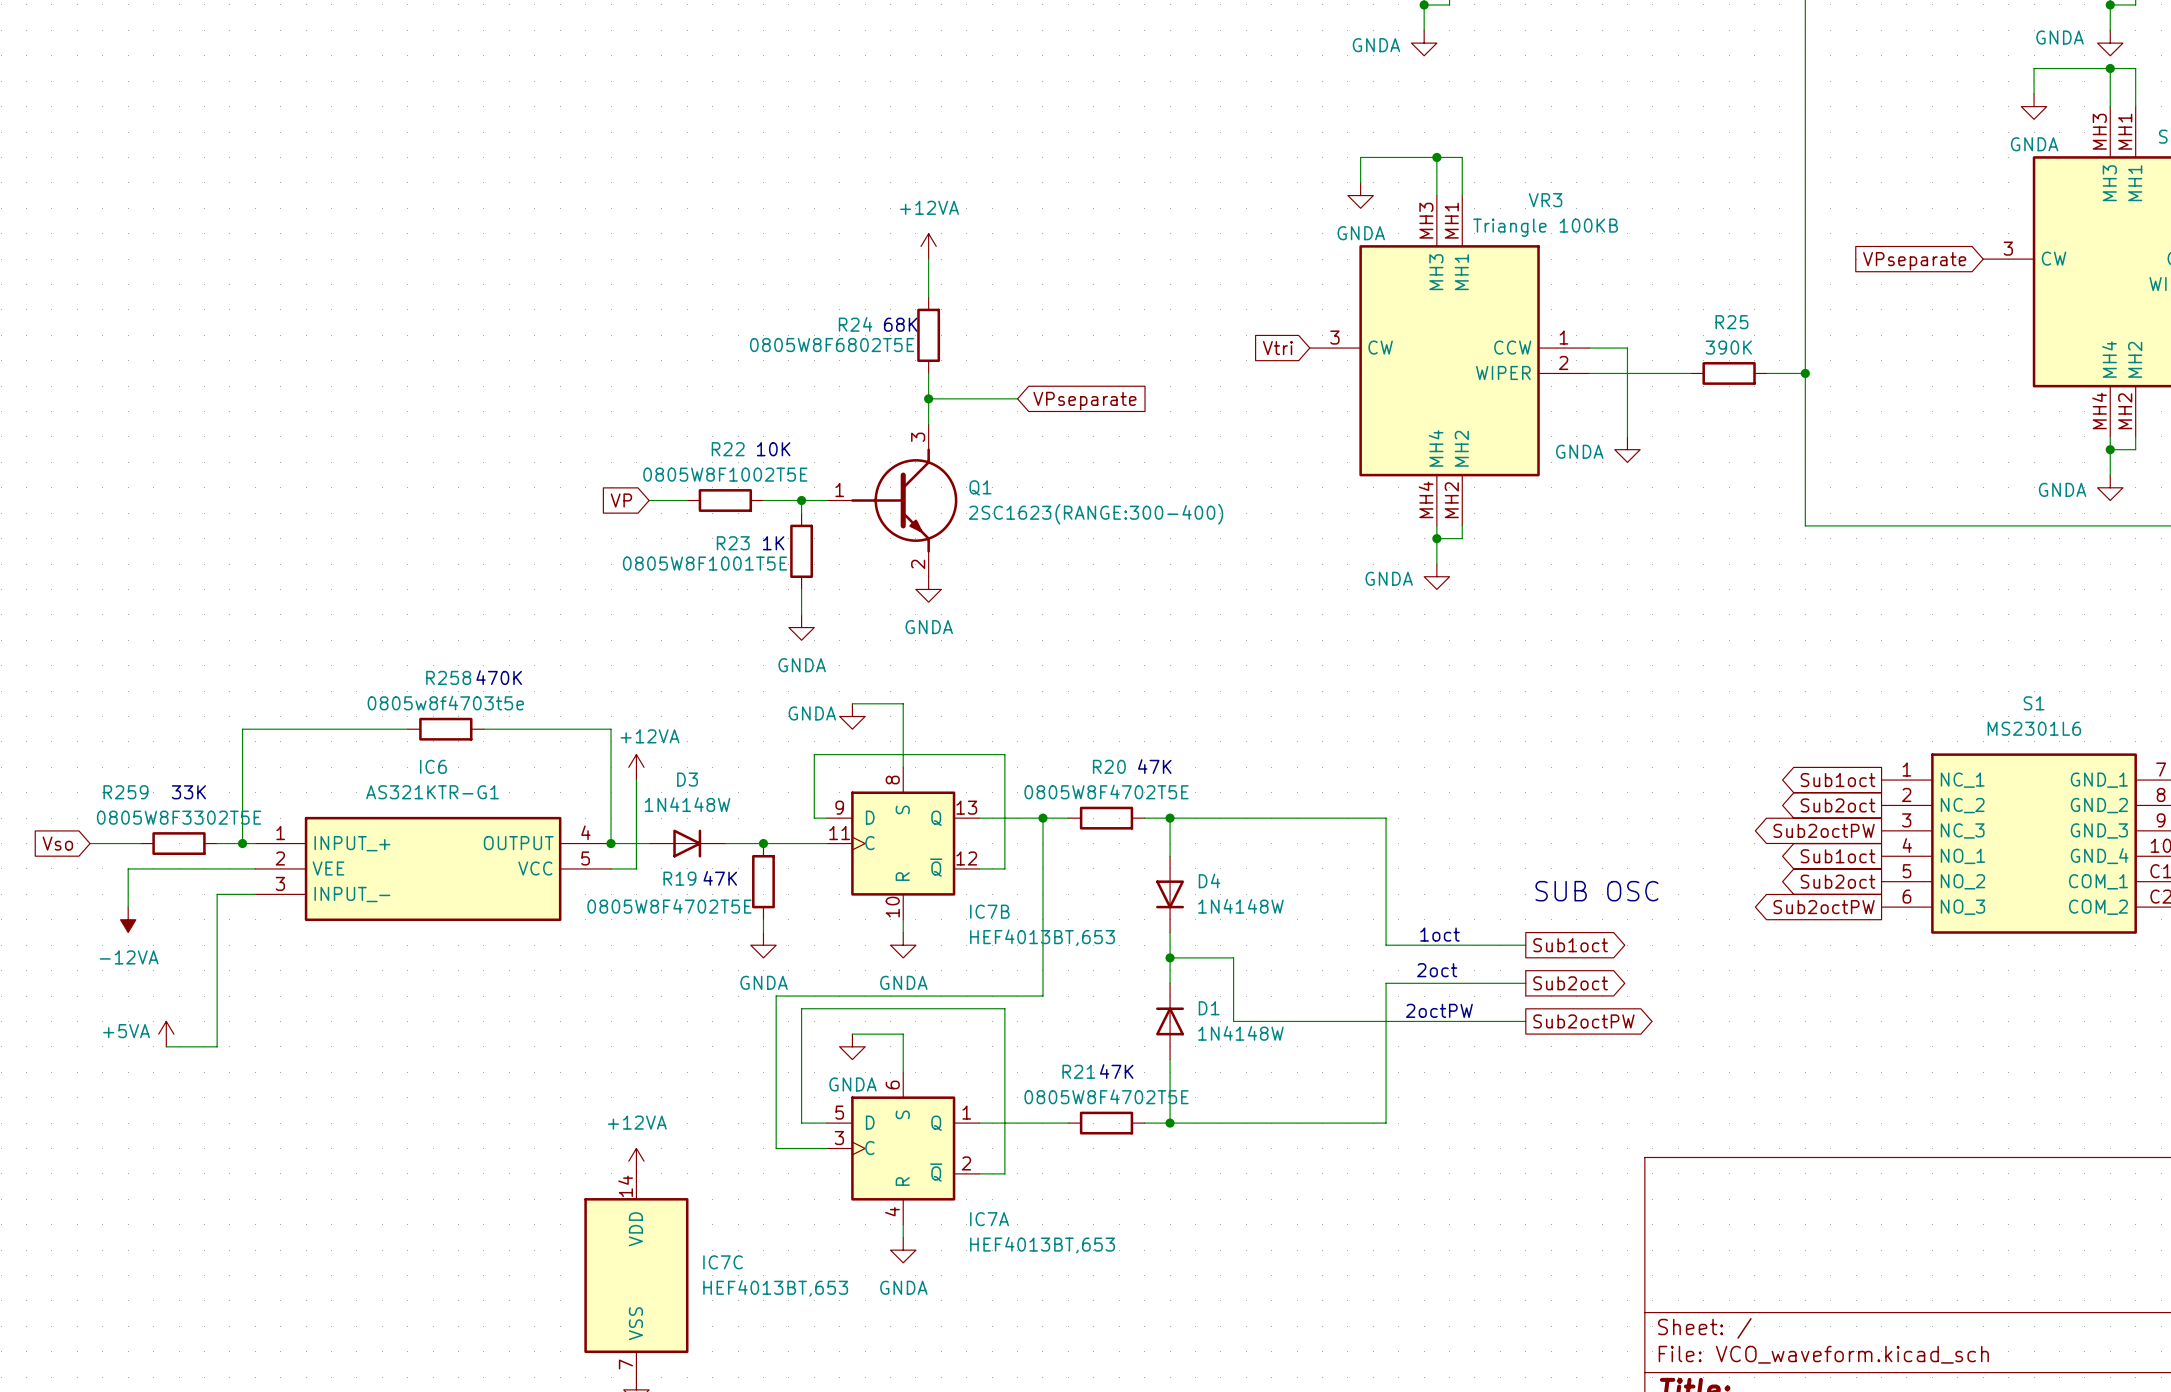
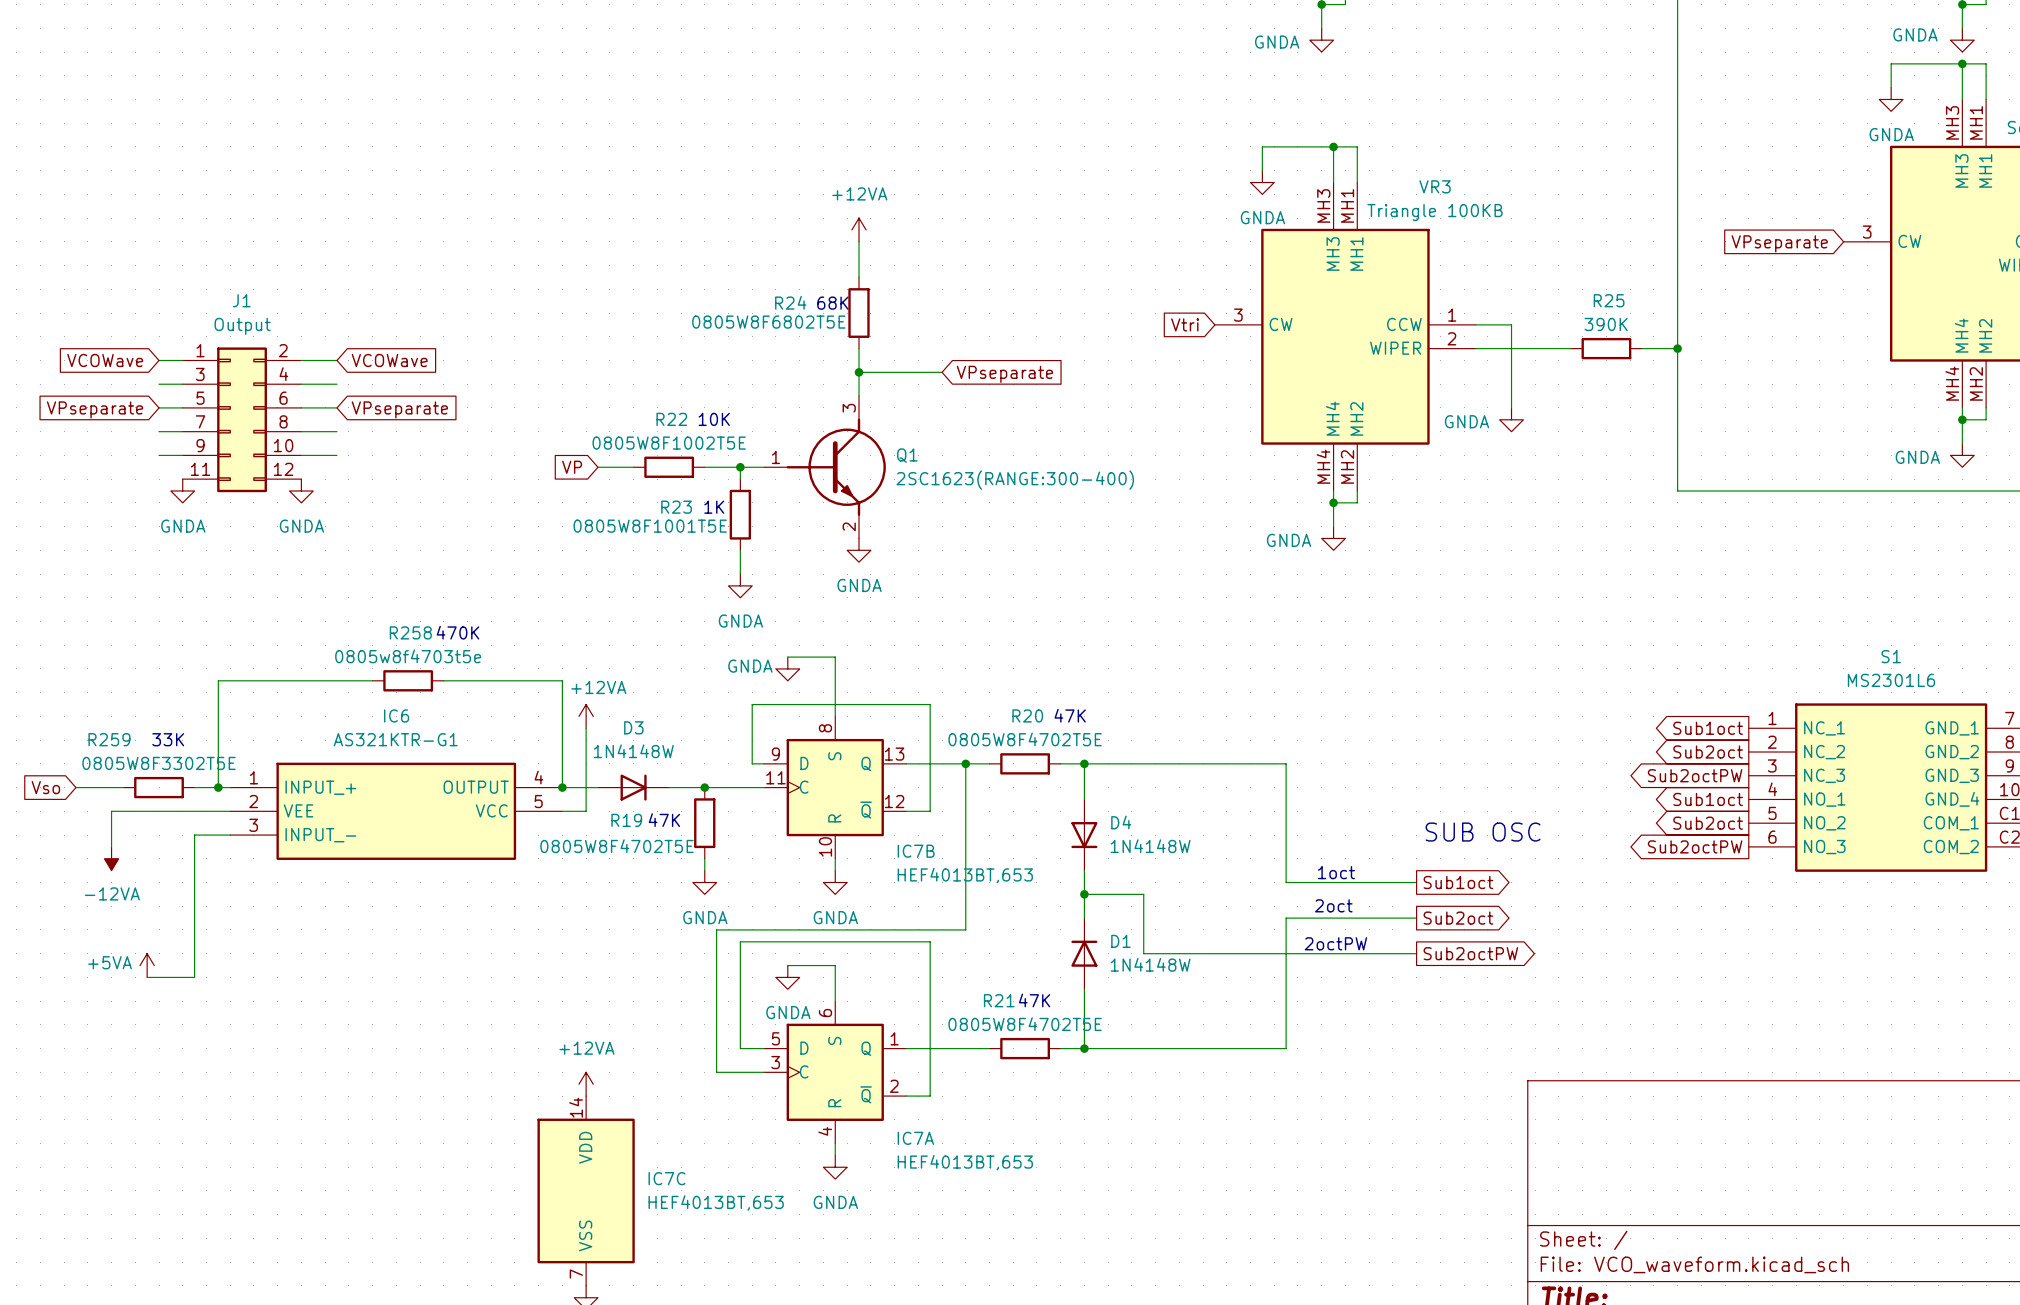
global label: none -> VCOWave (105, 360)
wire: none -> (159, 360) (182, 360)
wire: none -> (301, 360) (336, 360)
global label: none -> VCOWave (389, 360)
wire: none -> (159, 384) (182, 384)
wire: none -> (301, 384) (336, 384)
wire: none -> (159, 407) (182, 407)
wire: none -> (301, 407) (336, 407)
global label: none -> VPseparate (95, 409)
global label: none -> VPseparate (399, 409)
J1: none -> Output (242, 419)
wire: none -> (159, 431) (182, 431)
wire: none -> (301, 431) (336, 431)
wire: none -> (159, 455) (182, 455)
wire: none -> (301, 455) (336, 455)
power symbol: none -> GNDA (182, 490)
power symbol: none -> GNDA (301, 490)

